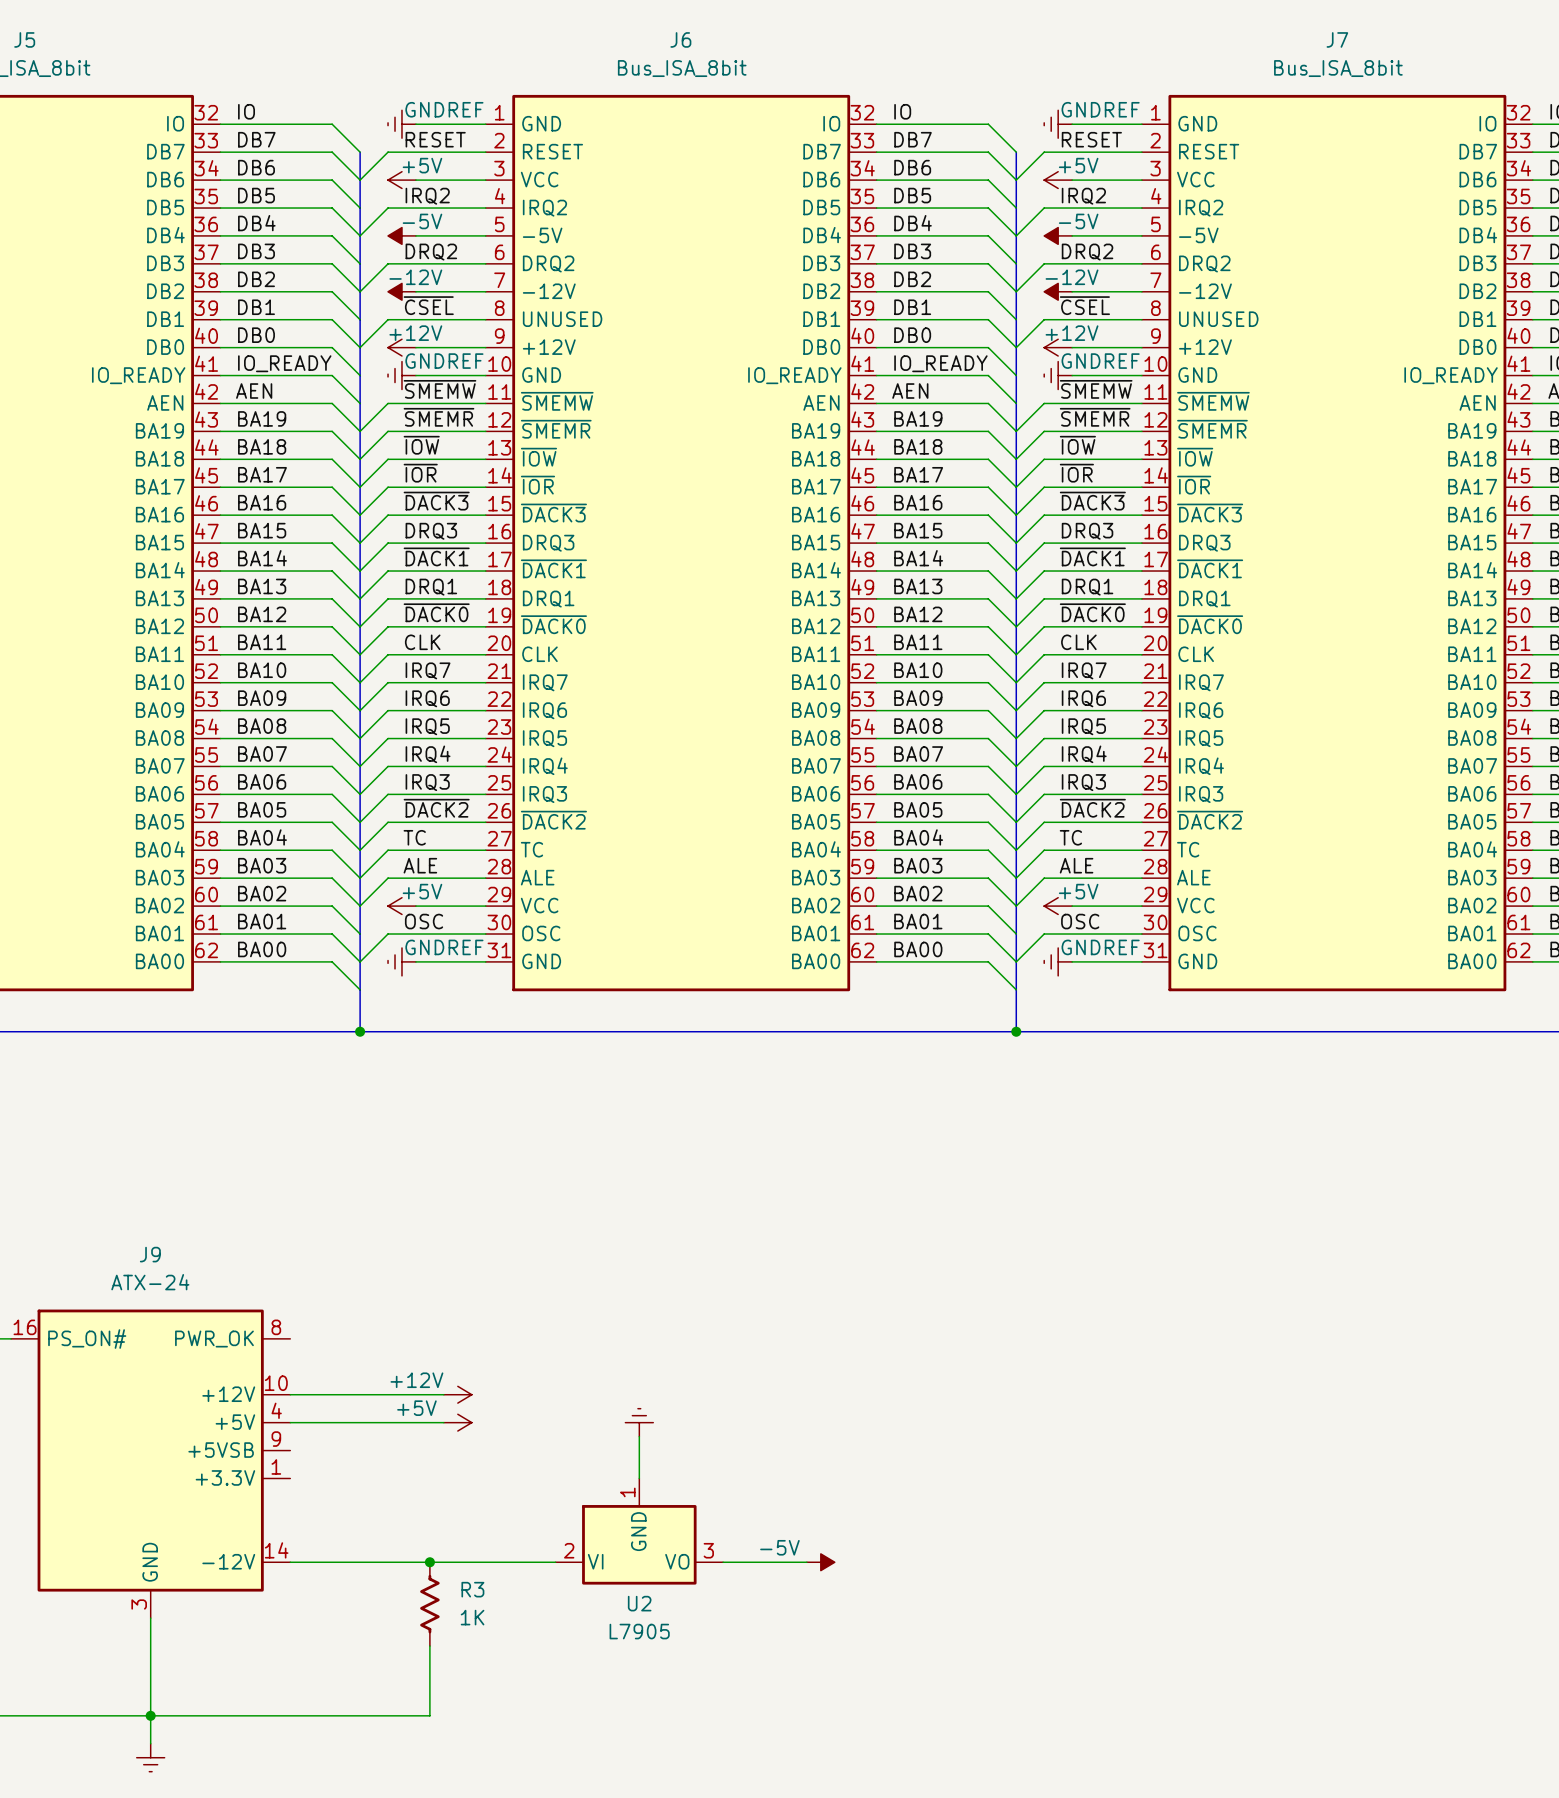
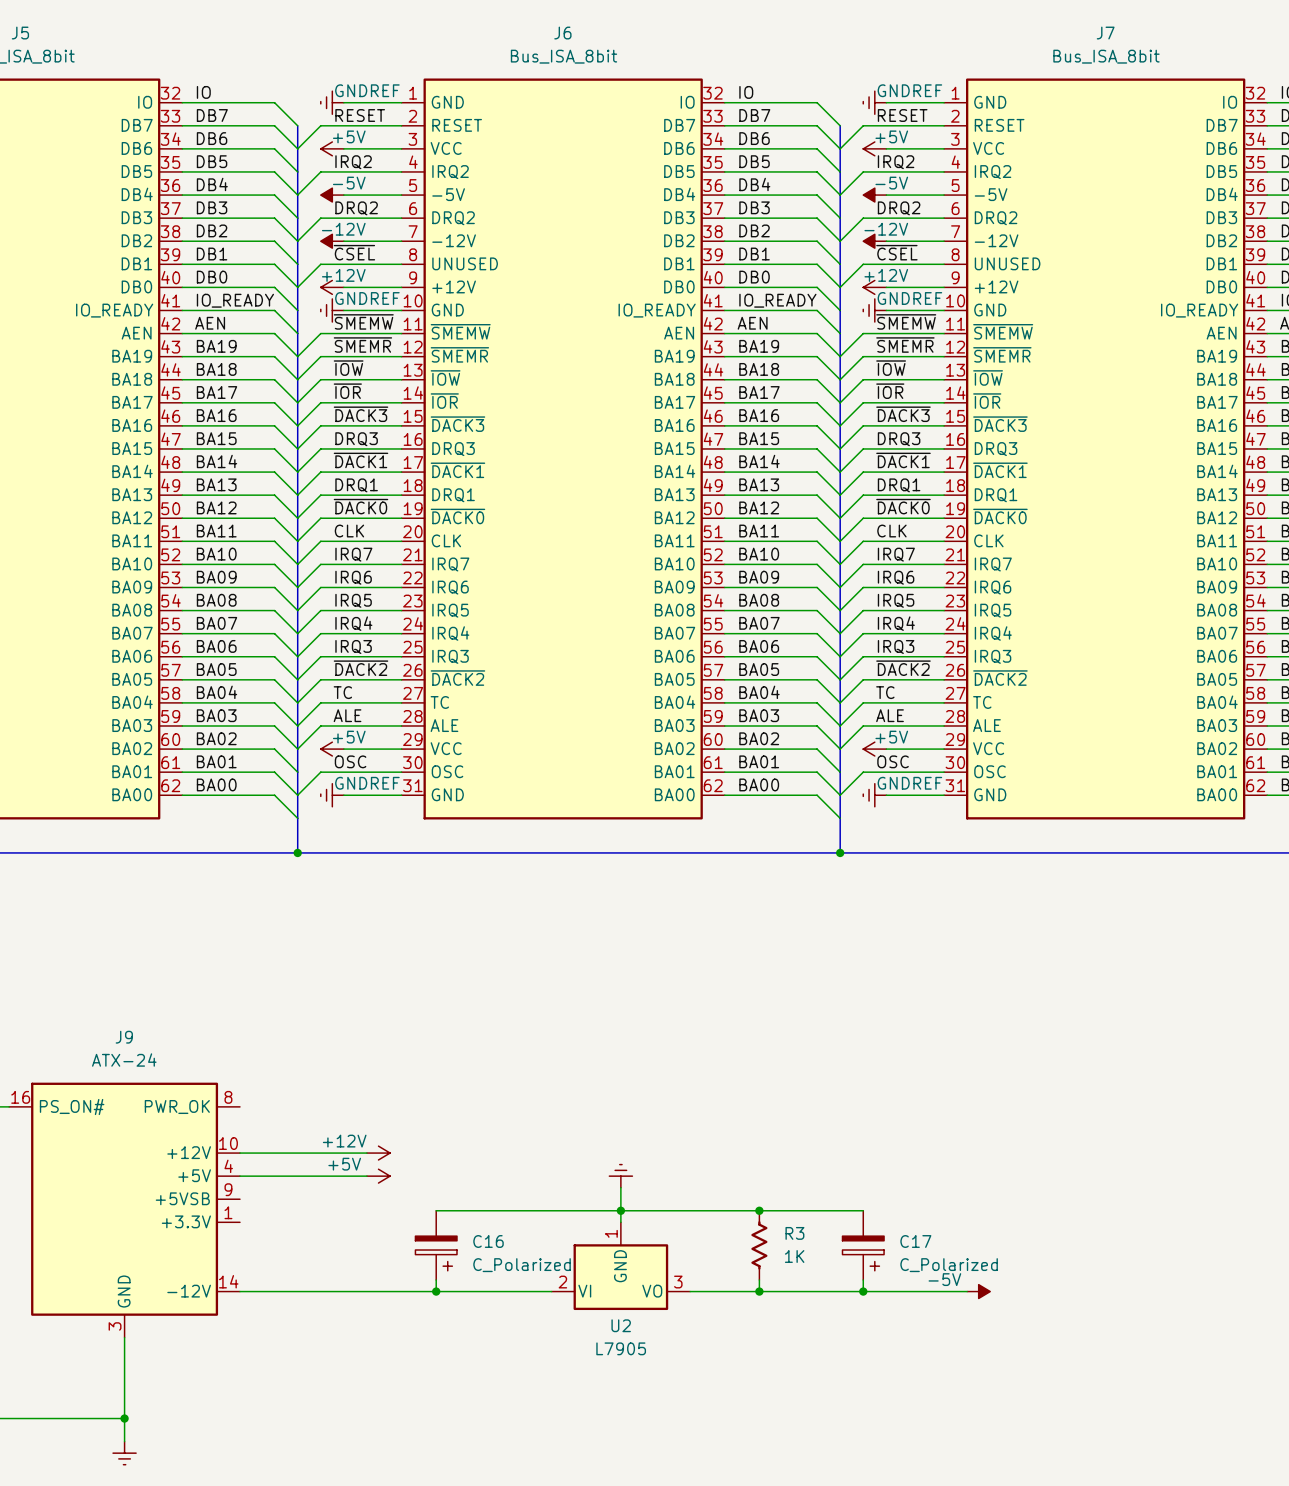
power symbol position: (639, 1422) -> (620, 1176)
wire: (639, 1436) (639, 1478) -> (620, 1187) (620, 1222)
wire: none -> (436, 1210) (863, 1210)
junction: none -> (620, 1210)
junction: none -> (759, 1210)
C16: none -> C_Polarized (436, 1245)
C17: none -> C_Polarized (863, 1245)
U2 position: (639, 1531) -> (620, 1266)
wire: none -> (436, 1280) (436, 1291)
wire: none -> (759, 1280) (759, 1291)
wire: none -> (863, 1280) (863, 1291)
junction: (429, 1562) -> none
junction: none -> (436, 1291)
power symbol: -5V (820, 1562) -> none
wire: none -> (690, 1291) (967, 1291)
junction: none -> (759, 1291)
junction: none -> (863, 1291)
power symbol: none -> -5V (978, 1291)
R3 position: (429, 1604) -> (759, 1245)
wire: (429, 1646) (429, 1715) (150, 1715) -> none

